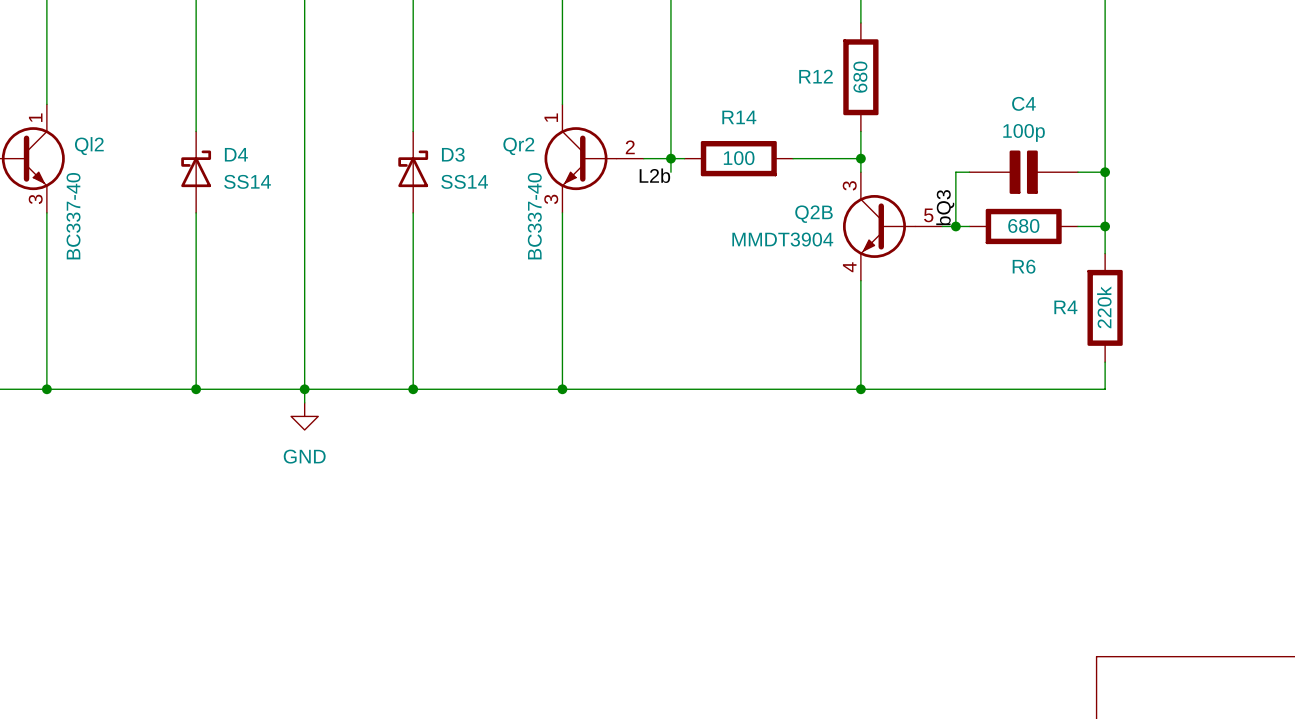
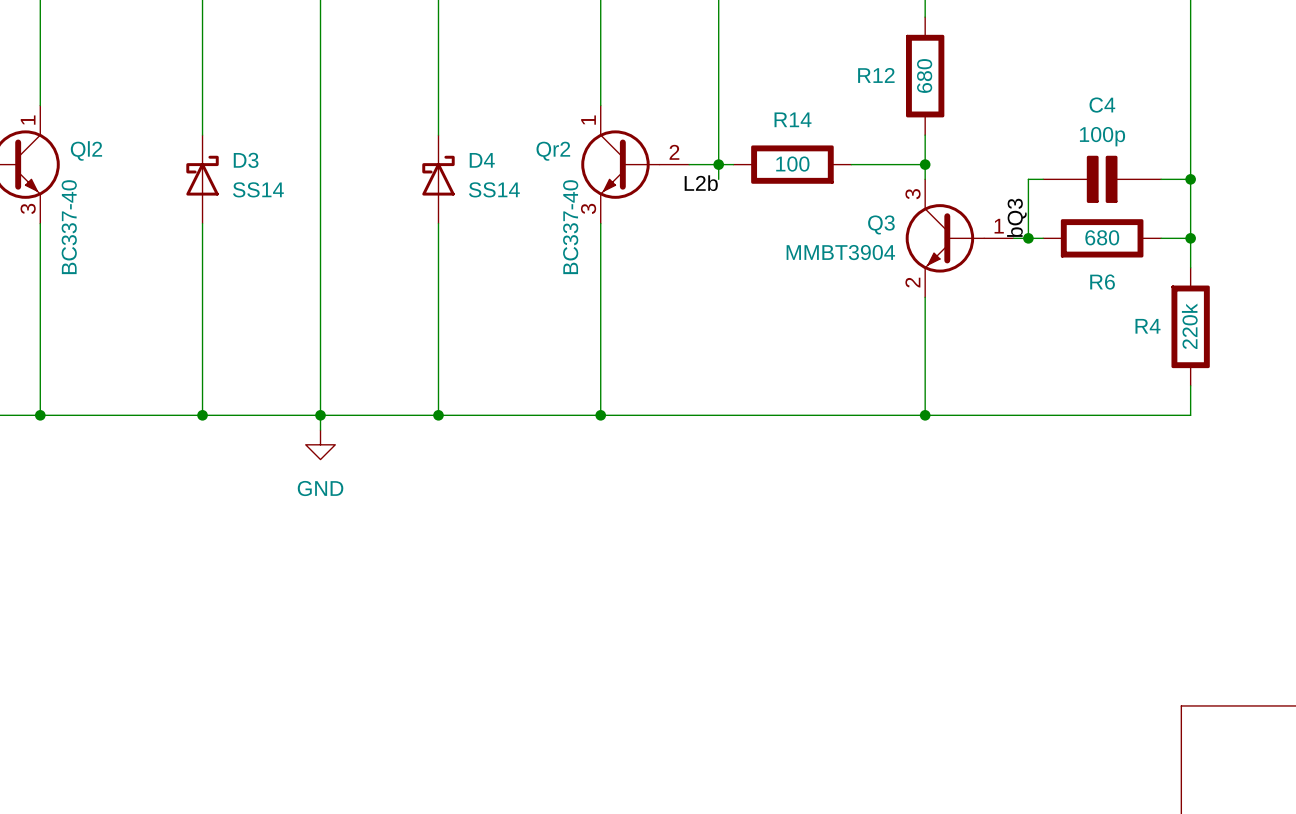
D4 name: D4 (236, 154) -> D3 (246, 160)
D3 name: D3 (453, 154) -> D4 (482, 160)
Q2B name: Q2B (813, 214) -> Q3 (881, 224)
Q2B pin number: 5 (928, 215) -> 1 (999, 226)
Q2B value: MMDT3904 (782, 239) -> MMBT3904 (840, 252)
Q2B pin number: 4 (849, 267) -> 2 (912, 282)

